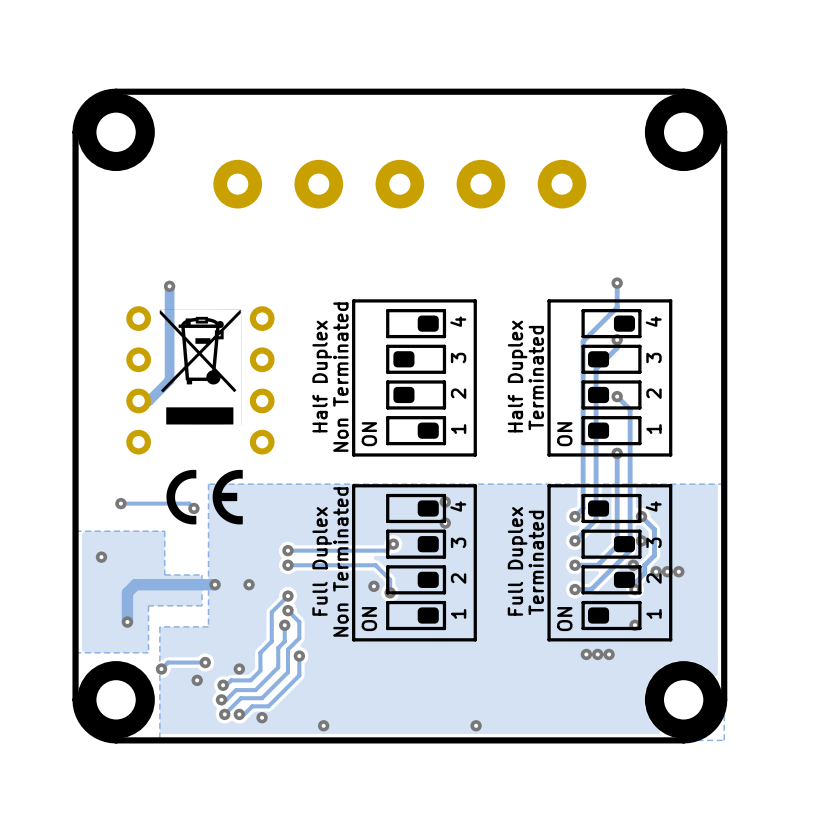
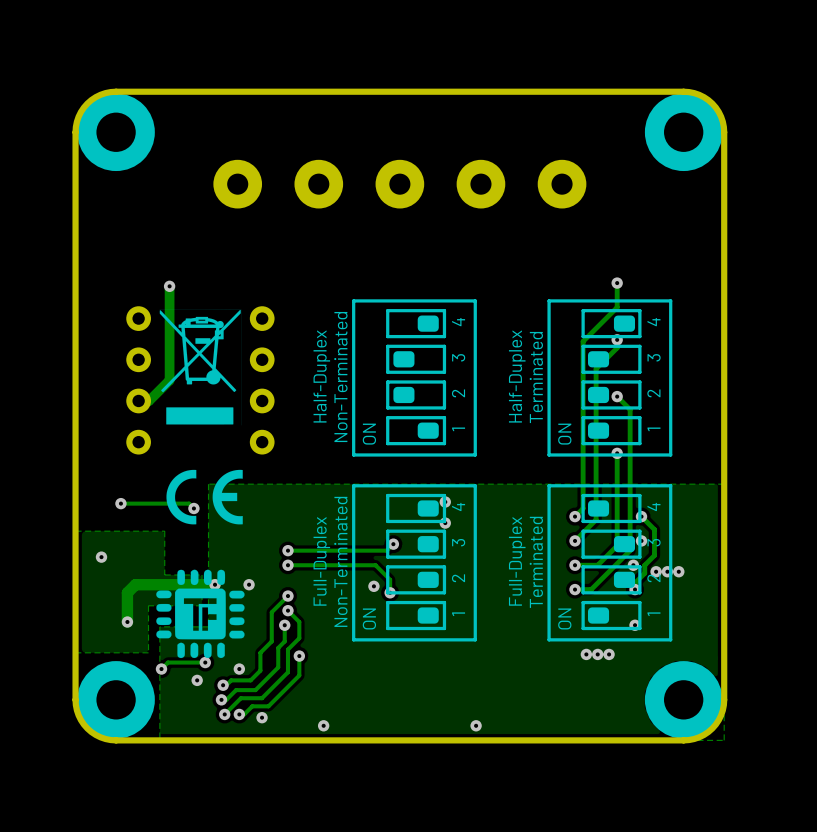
text: Half Duplex (322, 376) -> Half-Duplex (321, 376)
text: Half Duplex (517, 376) -> Half-Duplex (517, 376)
text: Non Terminated (340, 377) -> Non-Terminated (340, 377)
text: Full Duplex (322, 561) -> Full-Duplex (321, 561)
text: Full Duplex (517, 561) -> Full-Duplex (517, 561)
text: Non Terminated (340, 562) -> Non-Terminated (340, 561)
drawing: none -> [156, 569, 245, 659]

